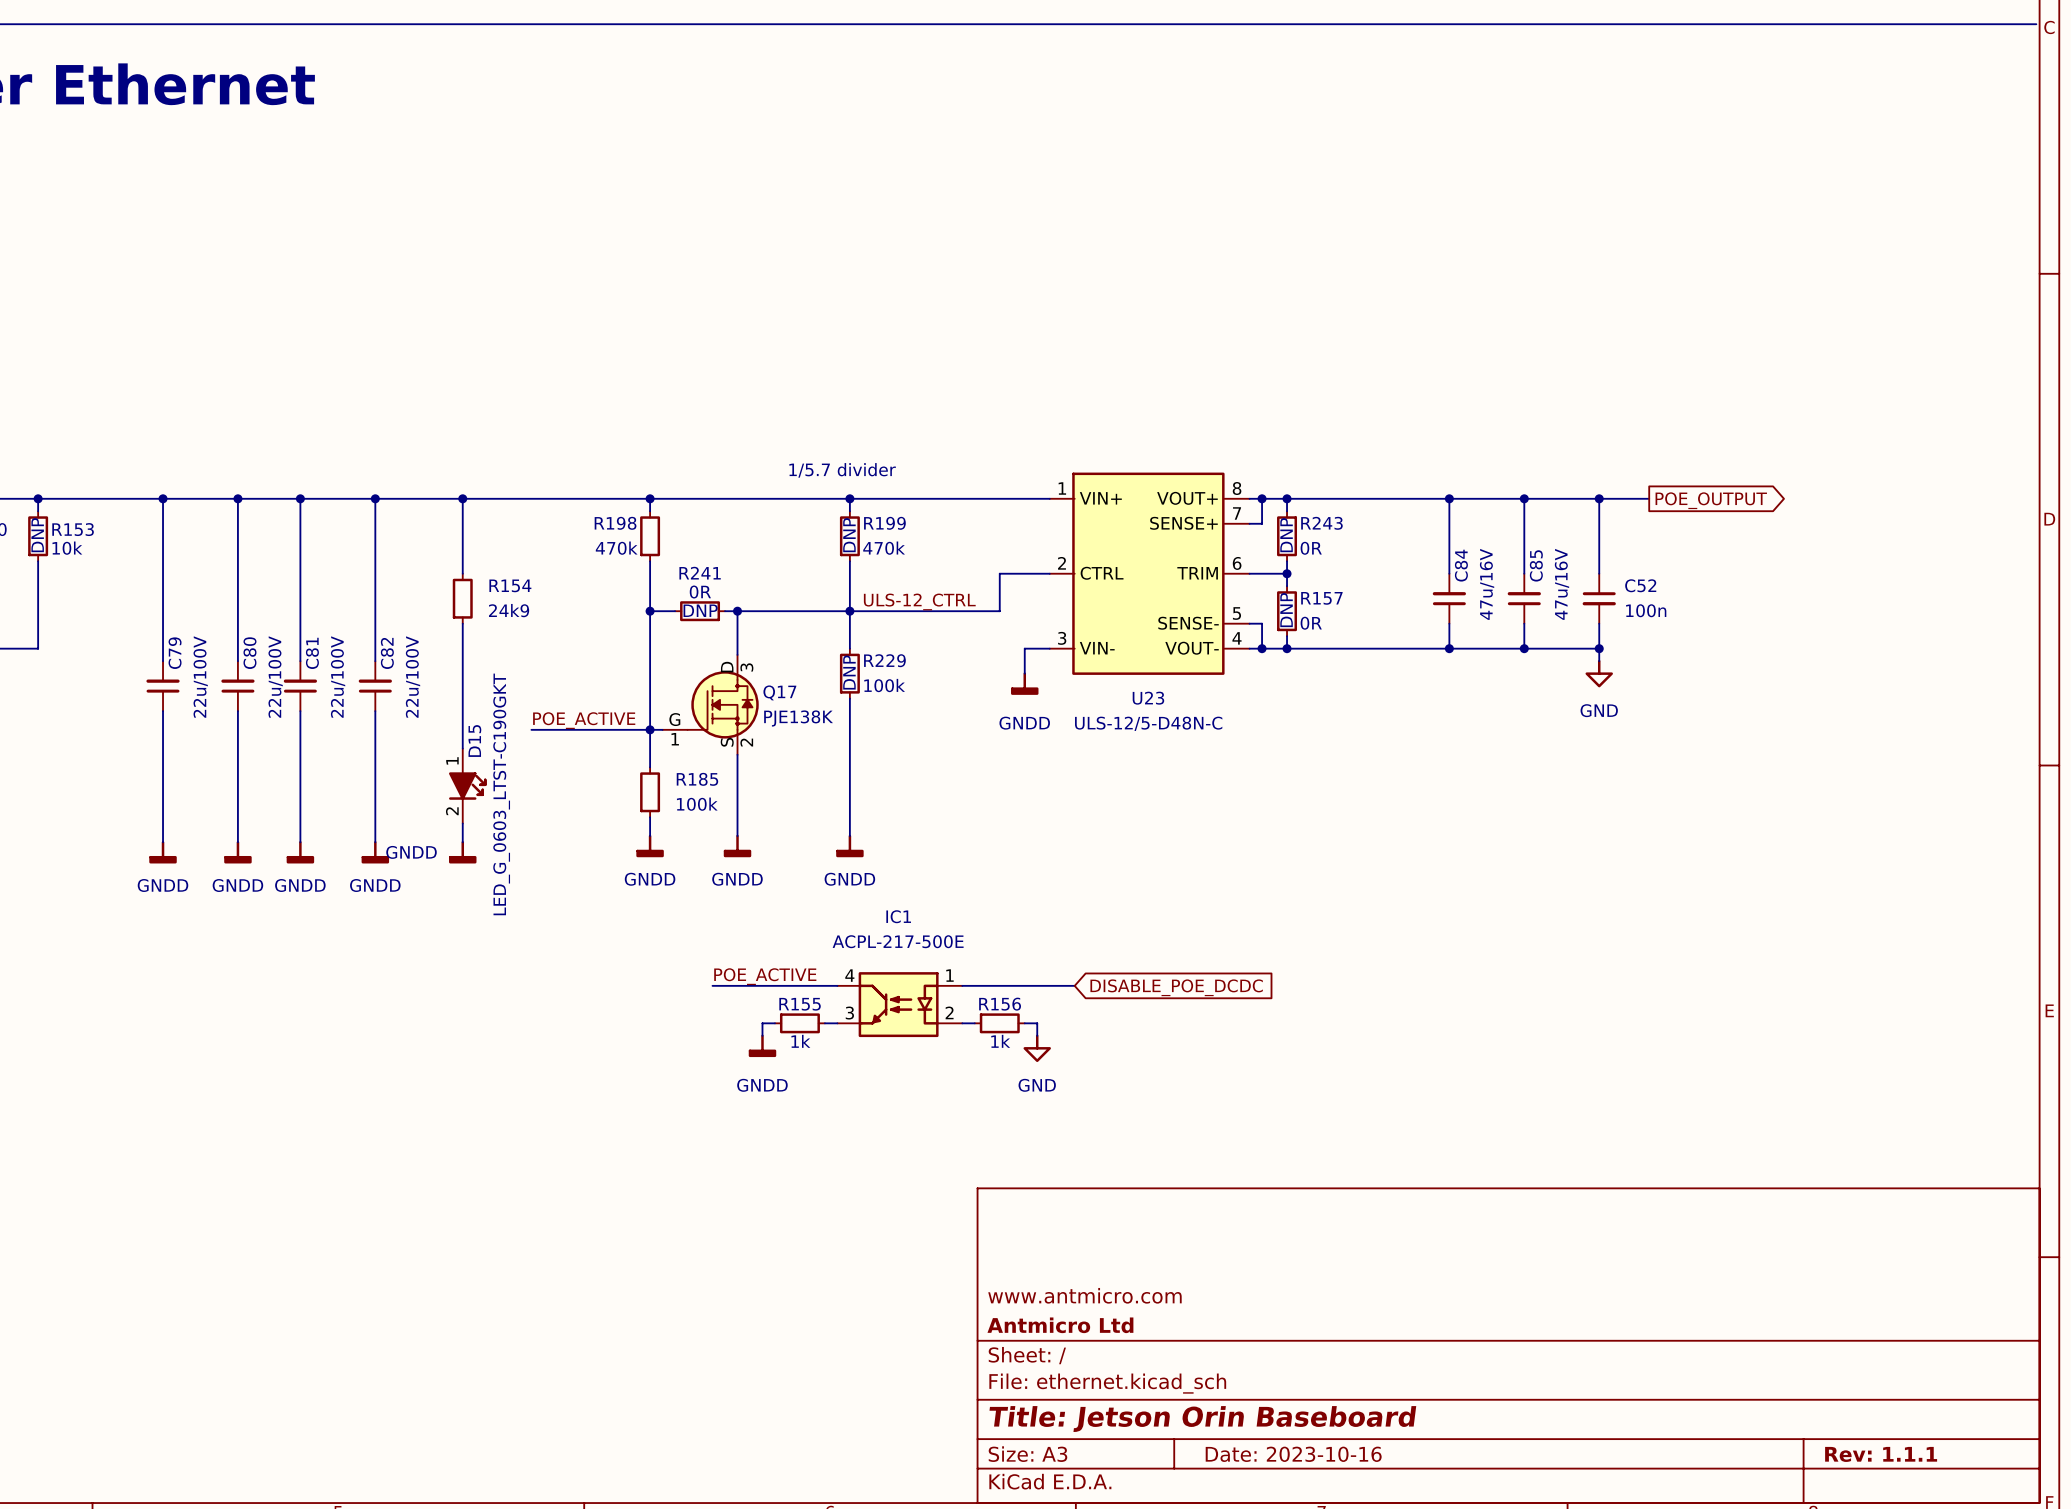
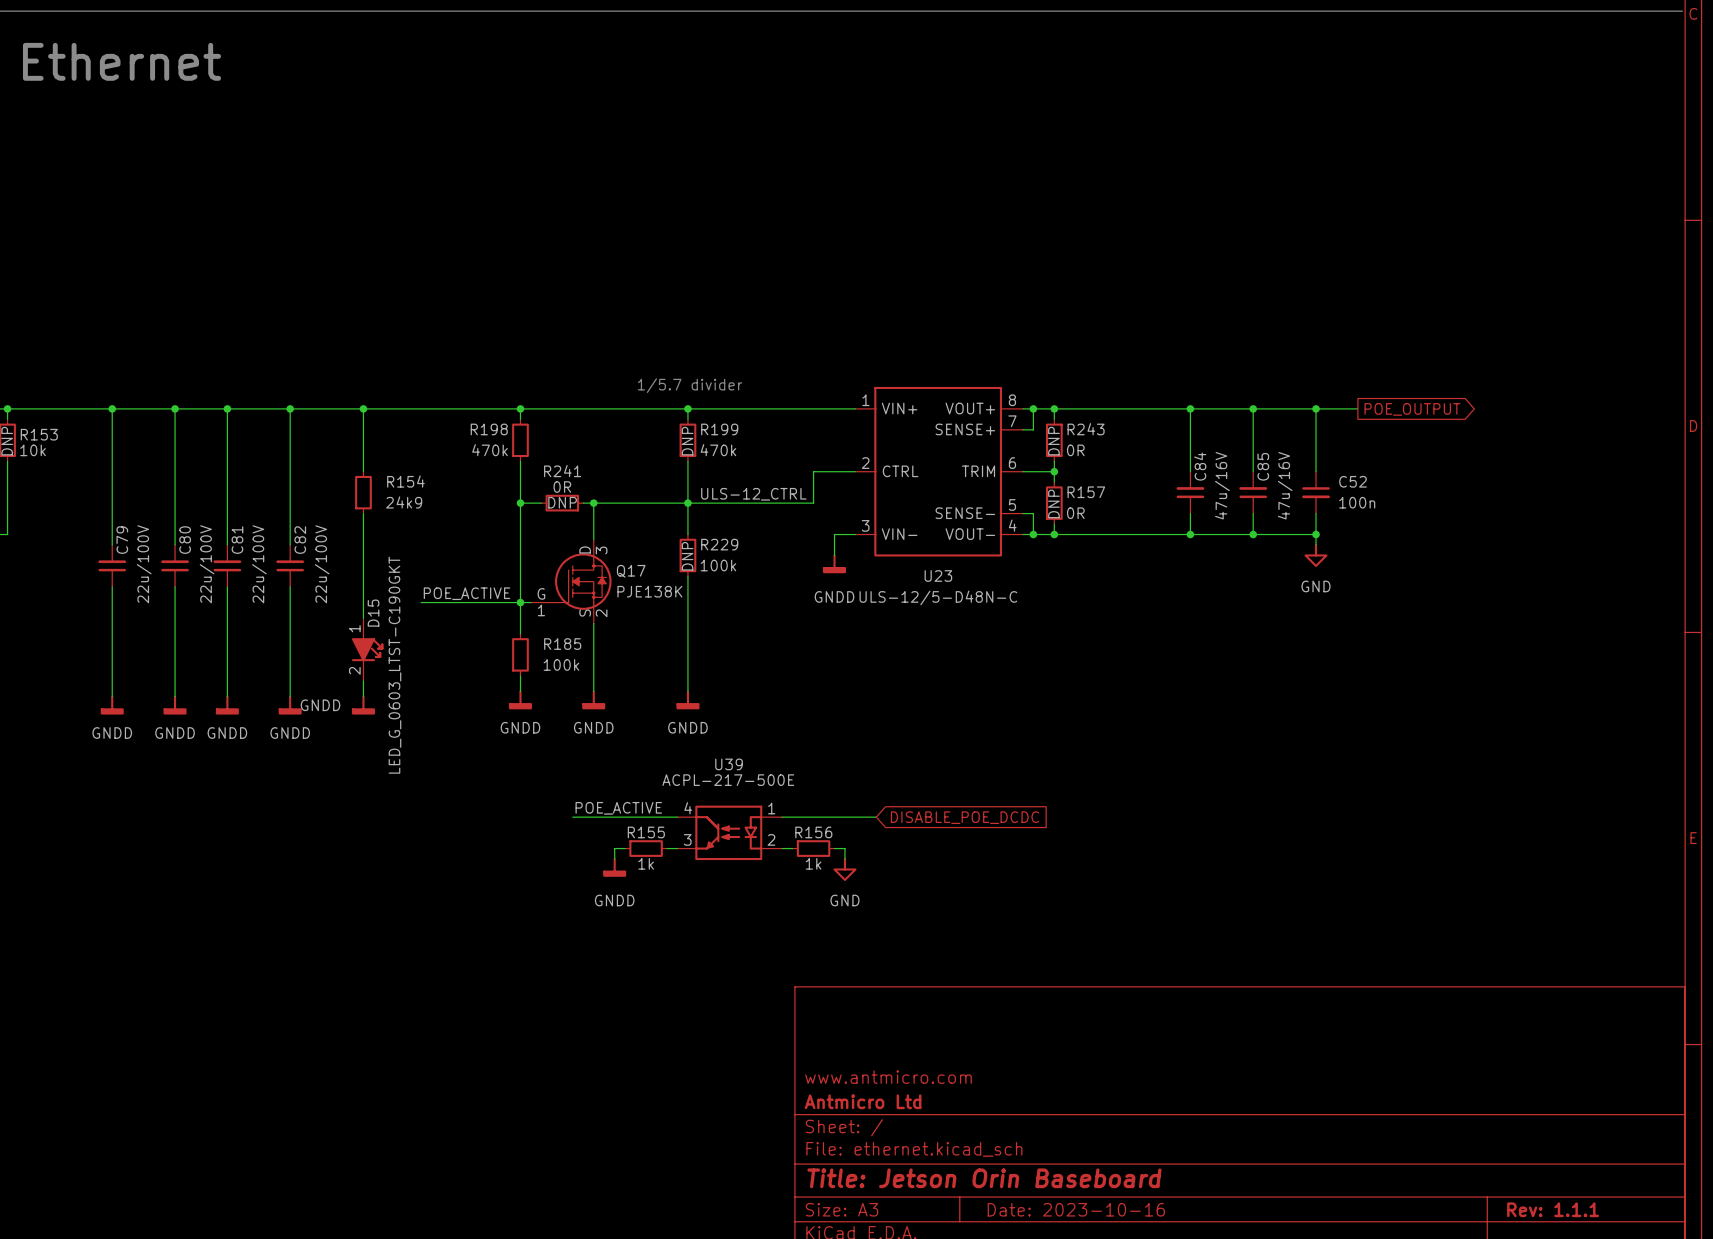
IC1 name: IC1 (898, 916) -> U39 (729, 764)

